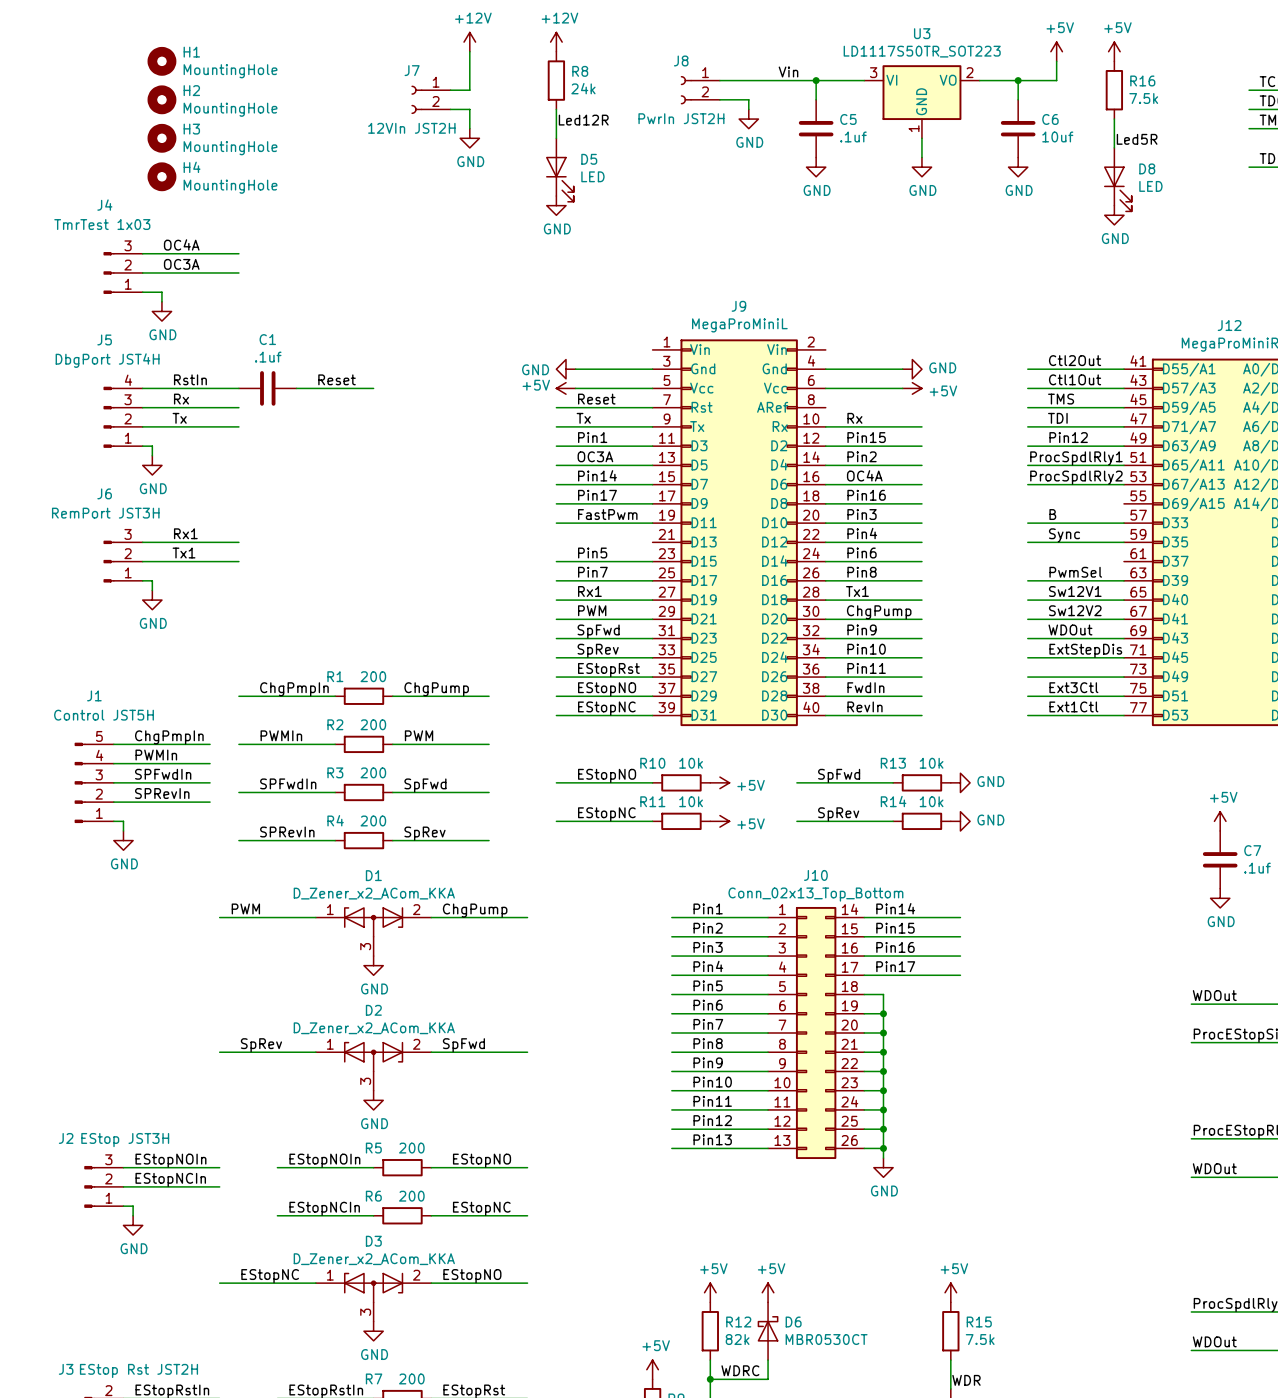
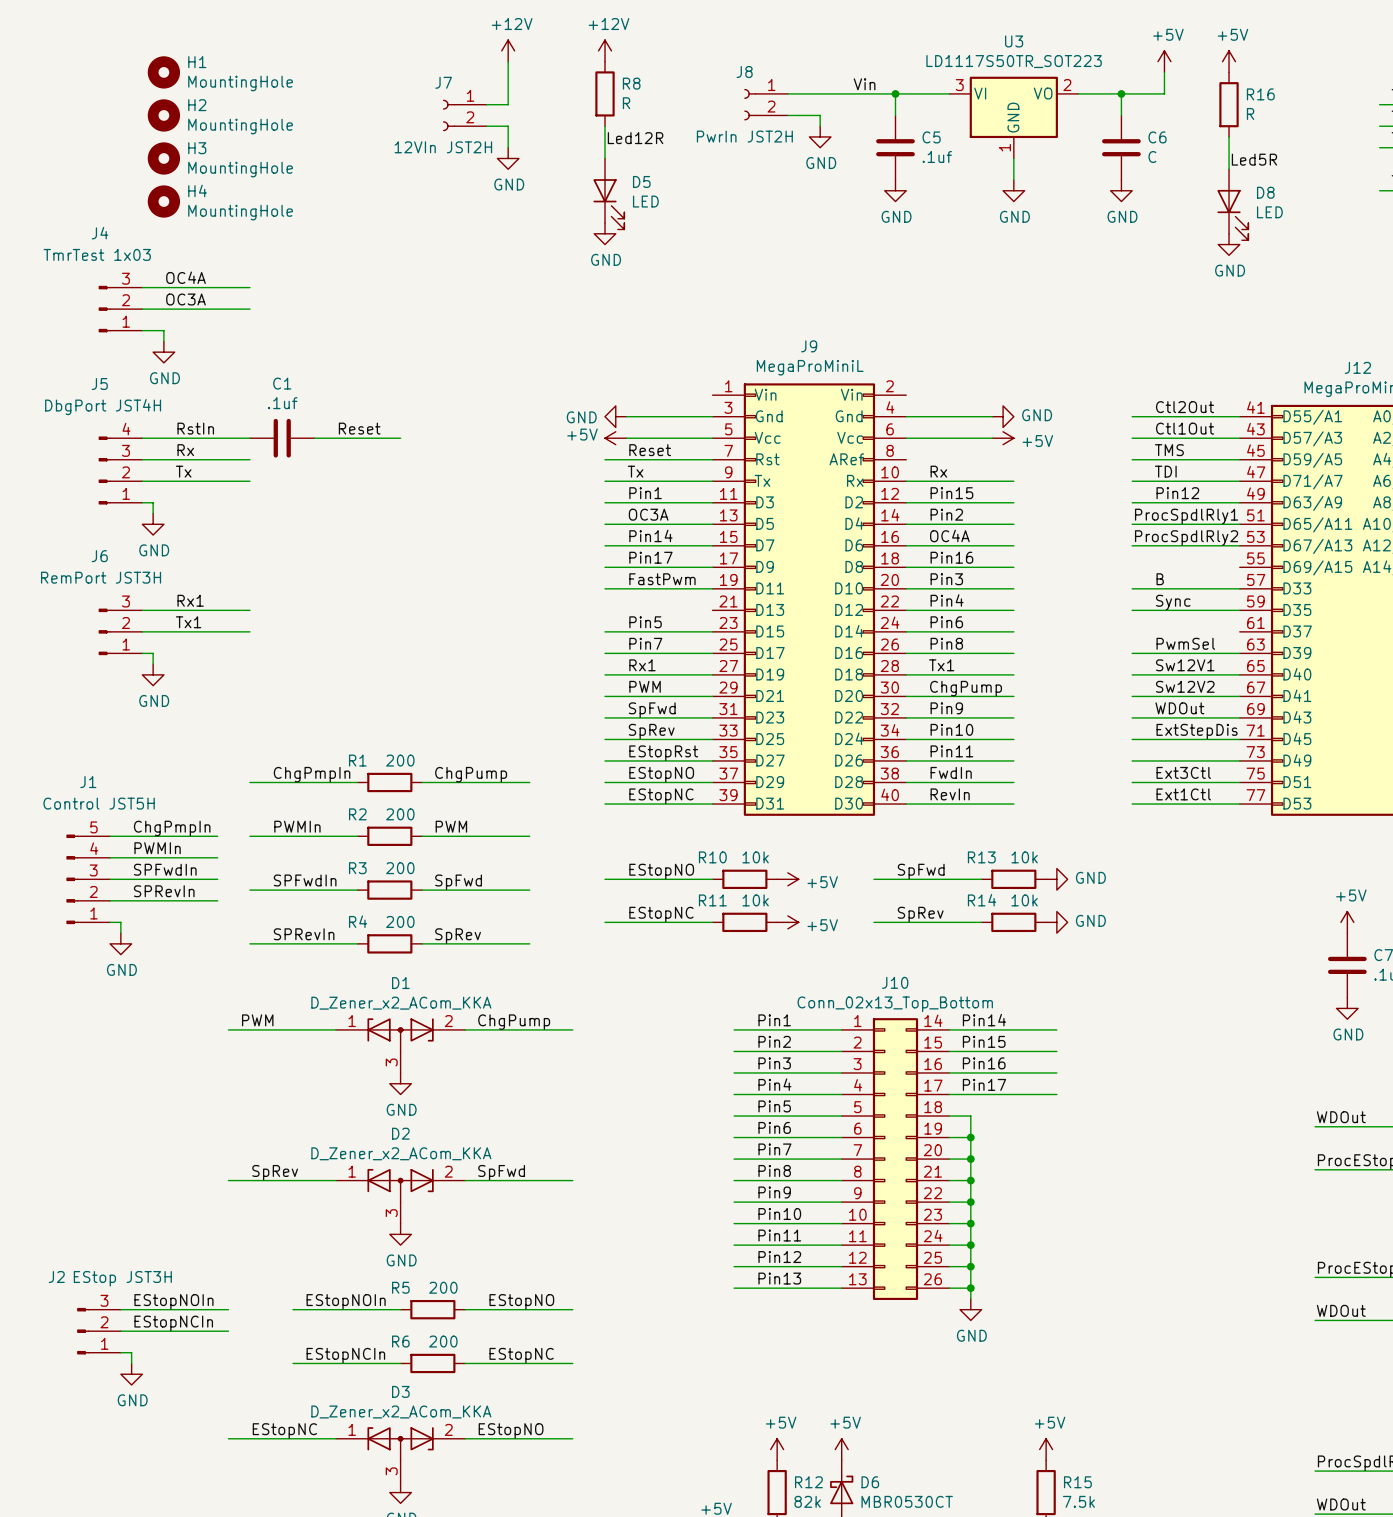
R8 value: 24k (583, 88) -> R (626, 103)
R16 value: 7.5k (1143, 98) -> R (1250, 113)
C6 value: 10uf (1057, 136) -> C (1152, 157)

